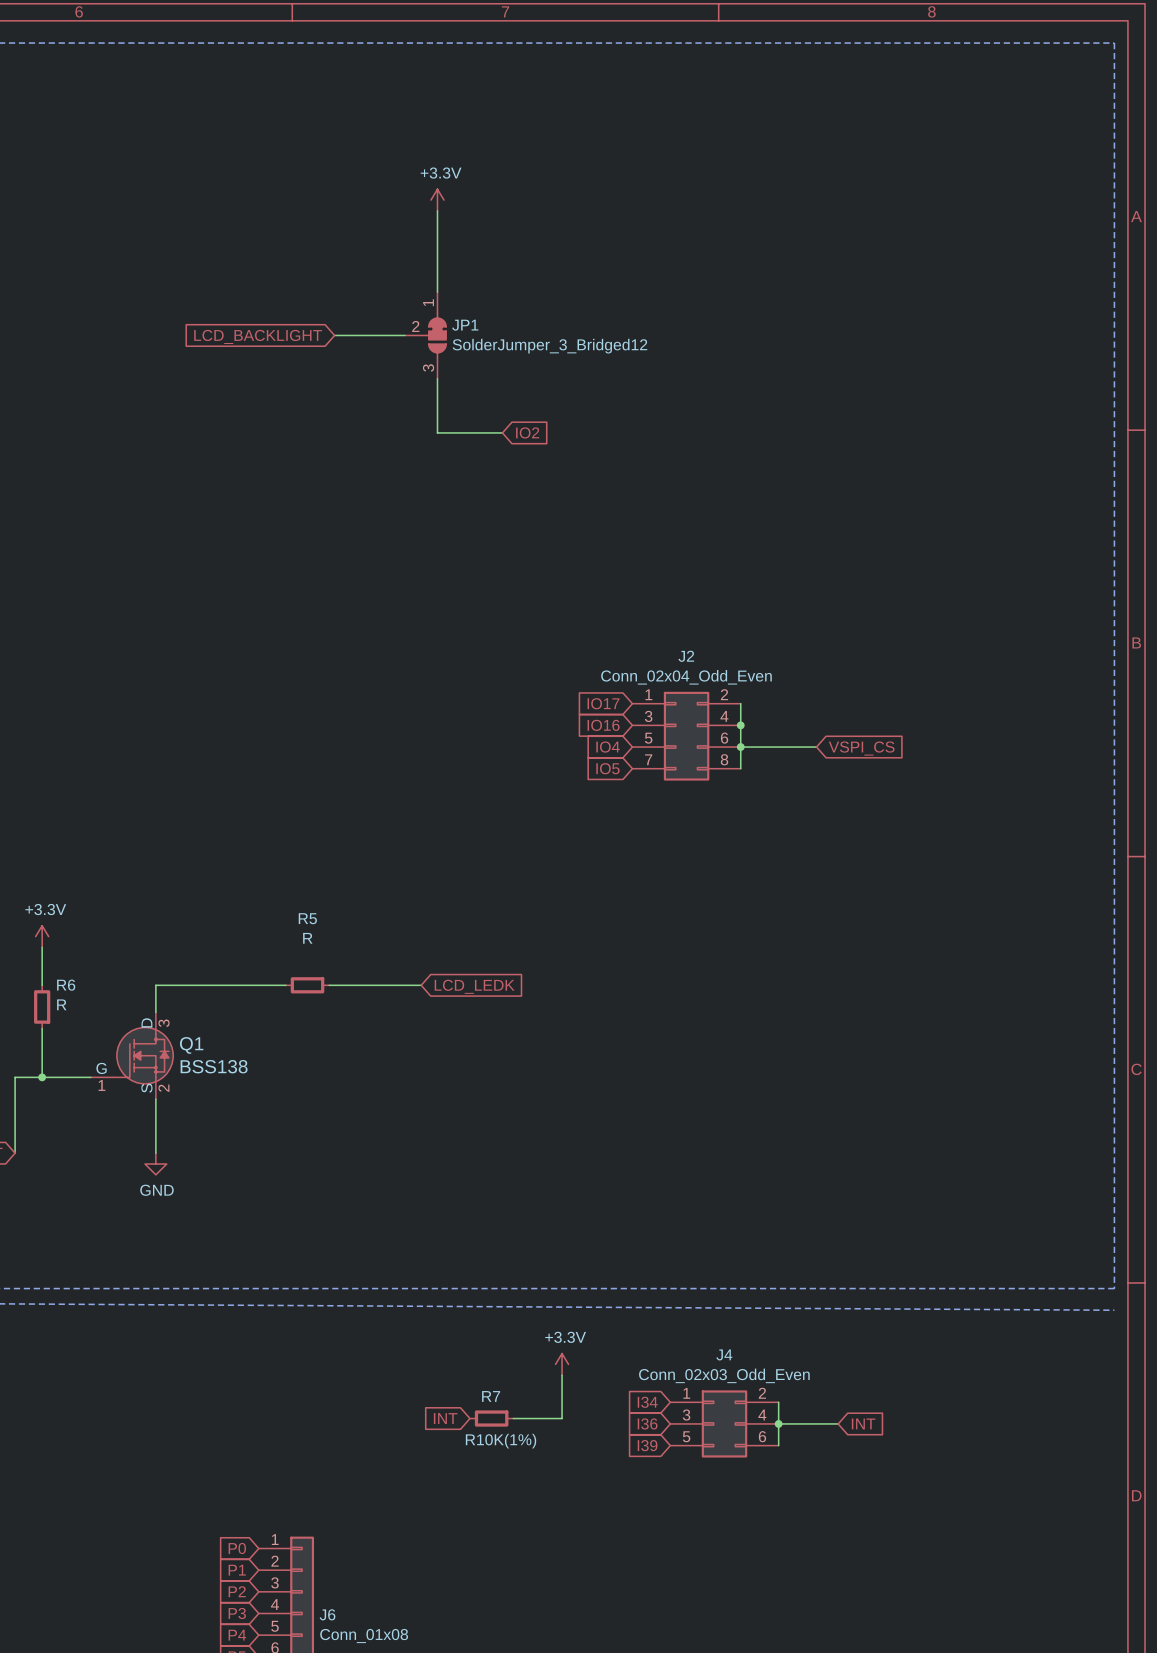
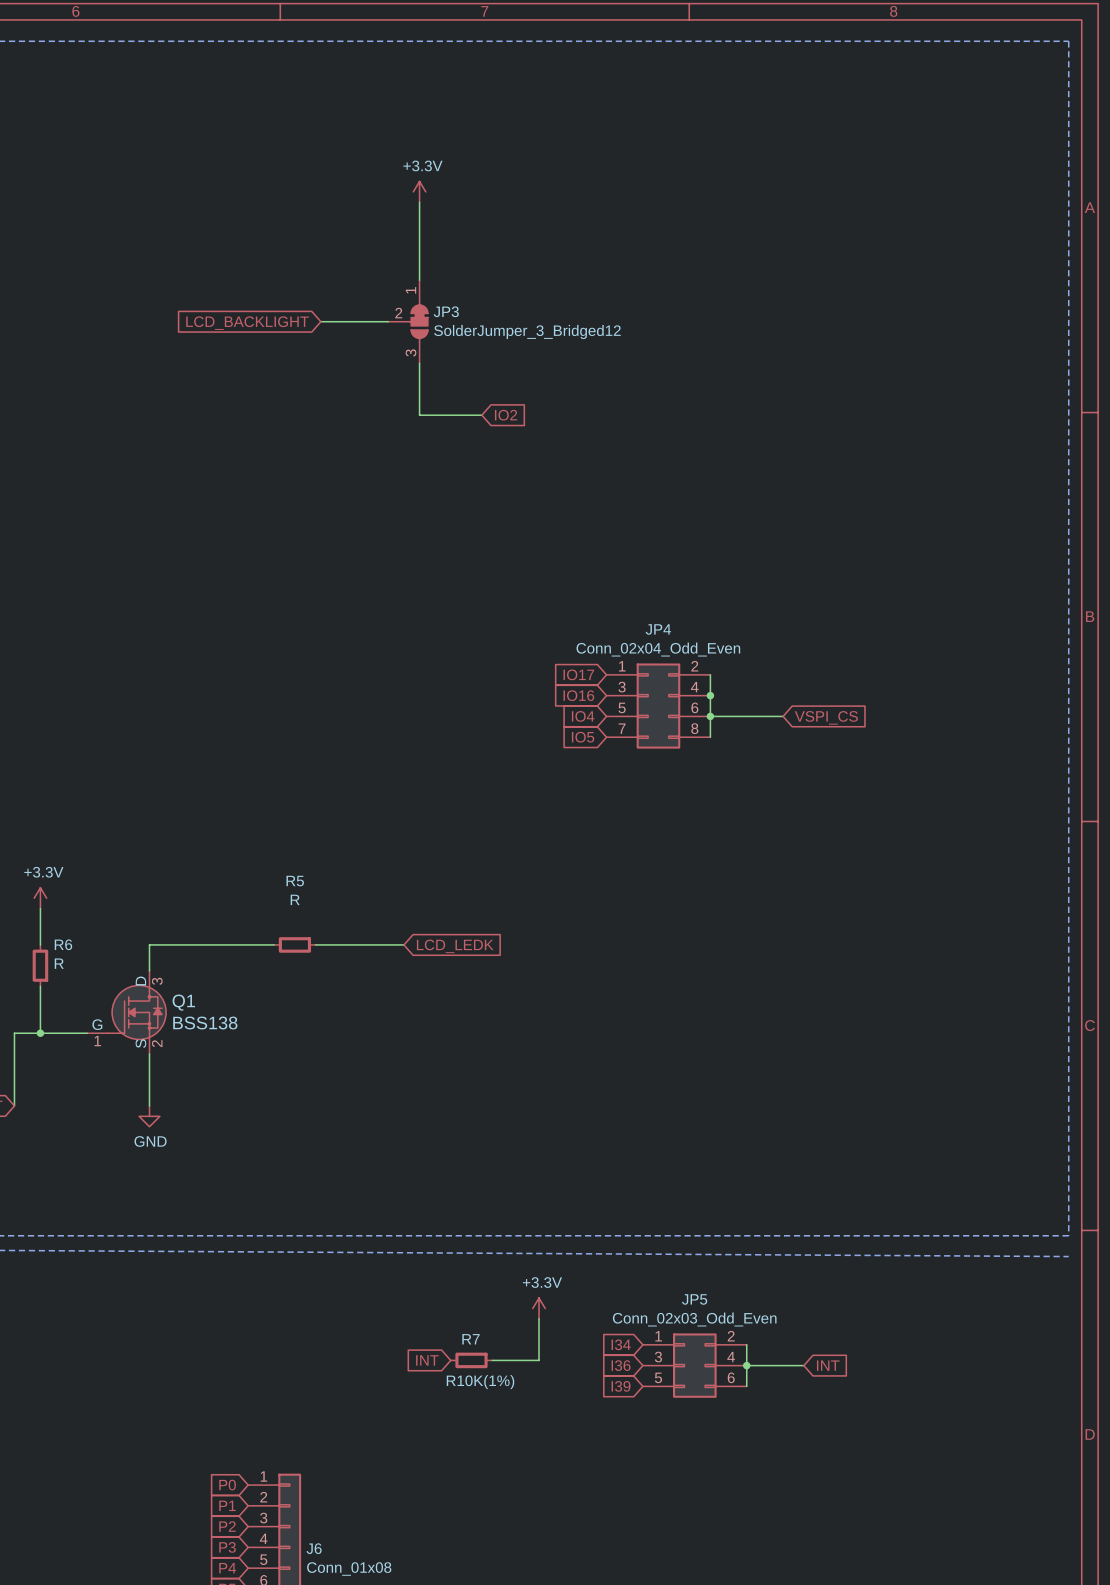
JP1 name: JP1 (465, 325) -> JP3 (446, 311)
J2 name: J2 (686, 656) -> JP4 (658, 629)
J4 name: J4 (724, 1354) -> JP5 (694, 1299)

